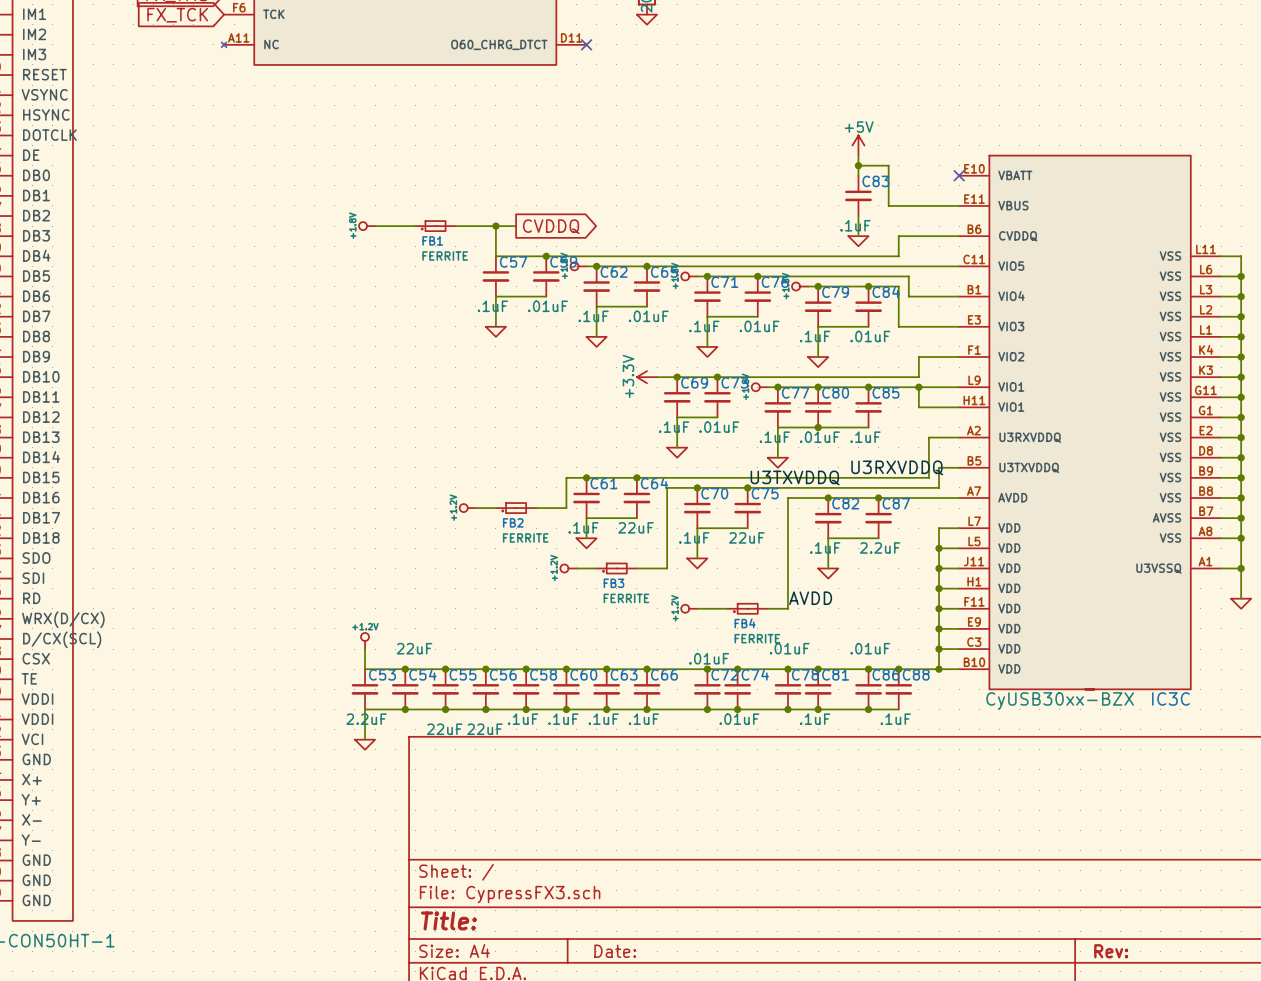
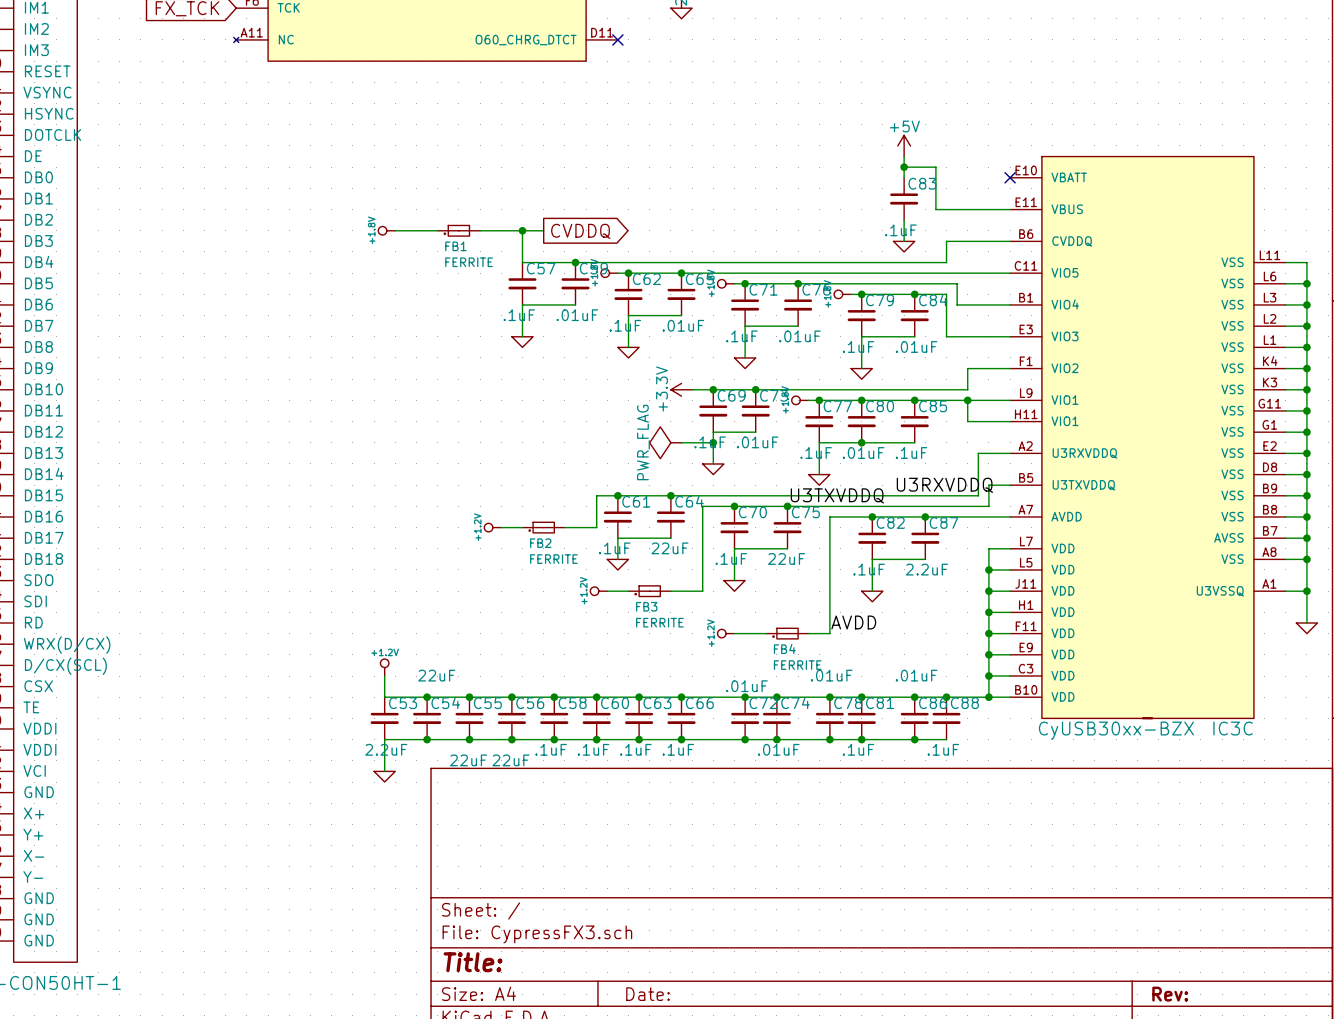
power symbol: none -> PWR_FLAG (665, 442)
wire: none -> (681, 442) (713, 442)
junction: none -> (713, 442)

